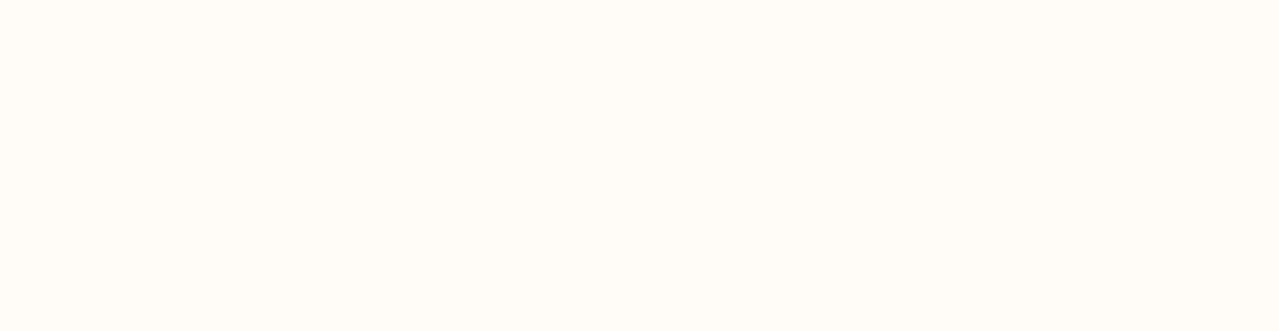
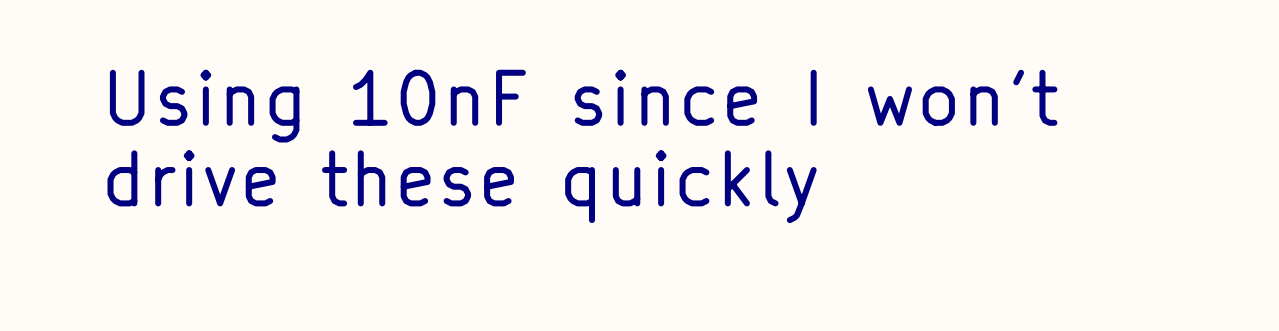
text: none -> Using 10nF since I won't (583, 106)
text: none -> drive these quickly (462, 186)

